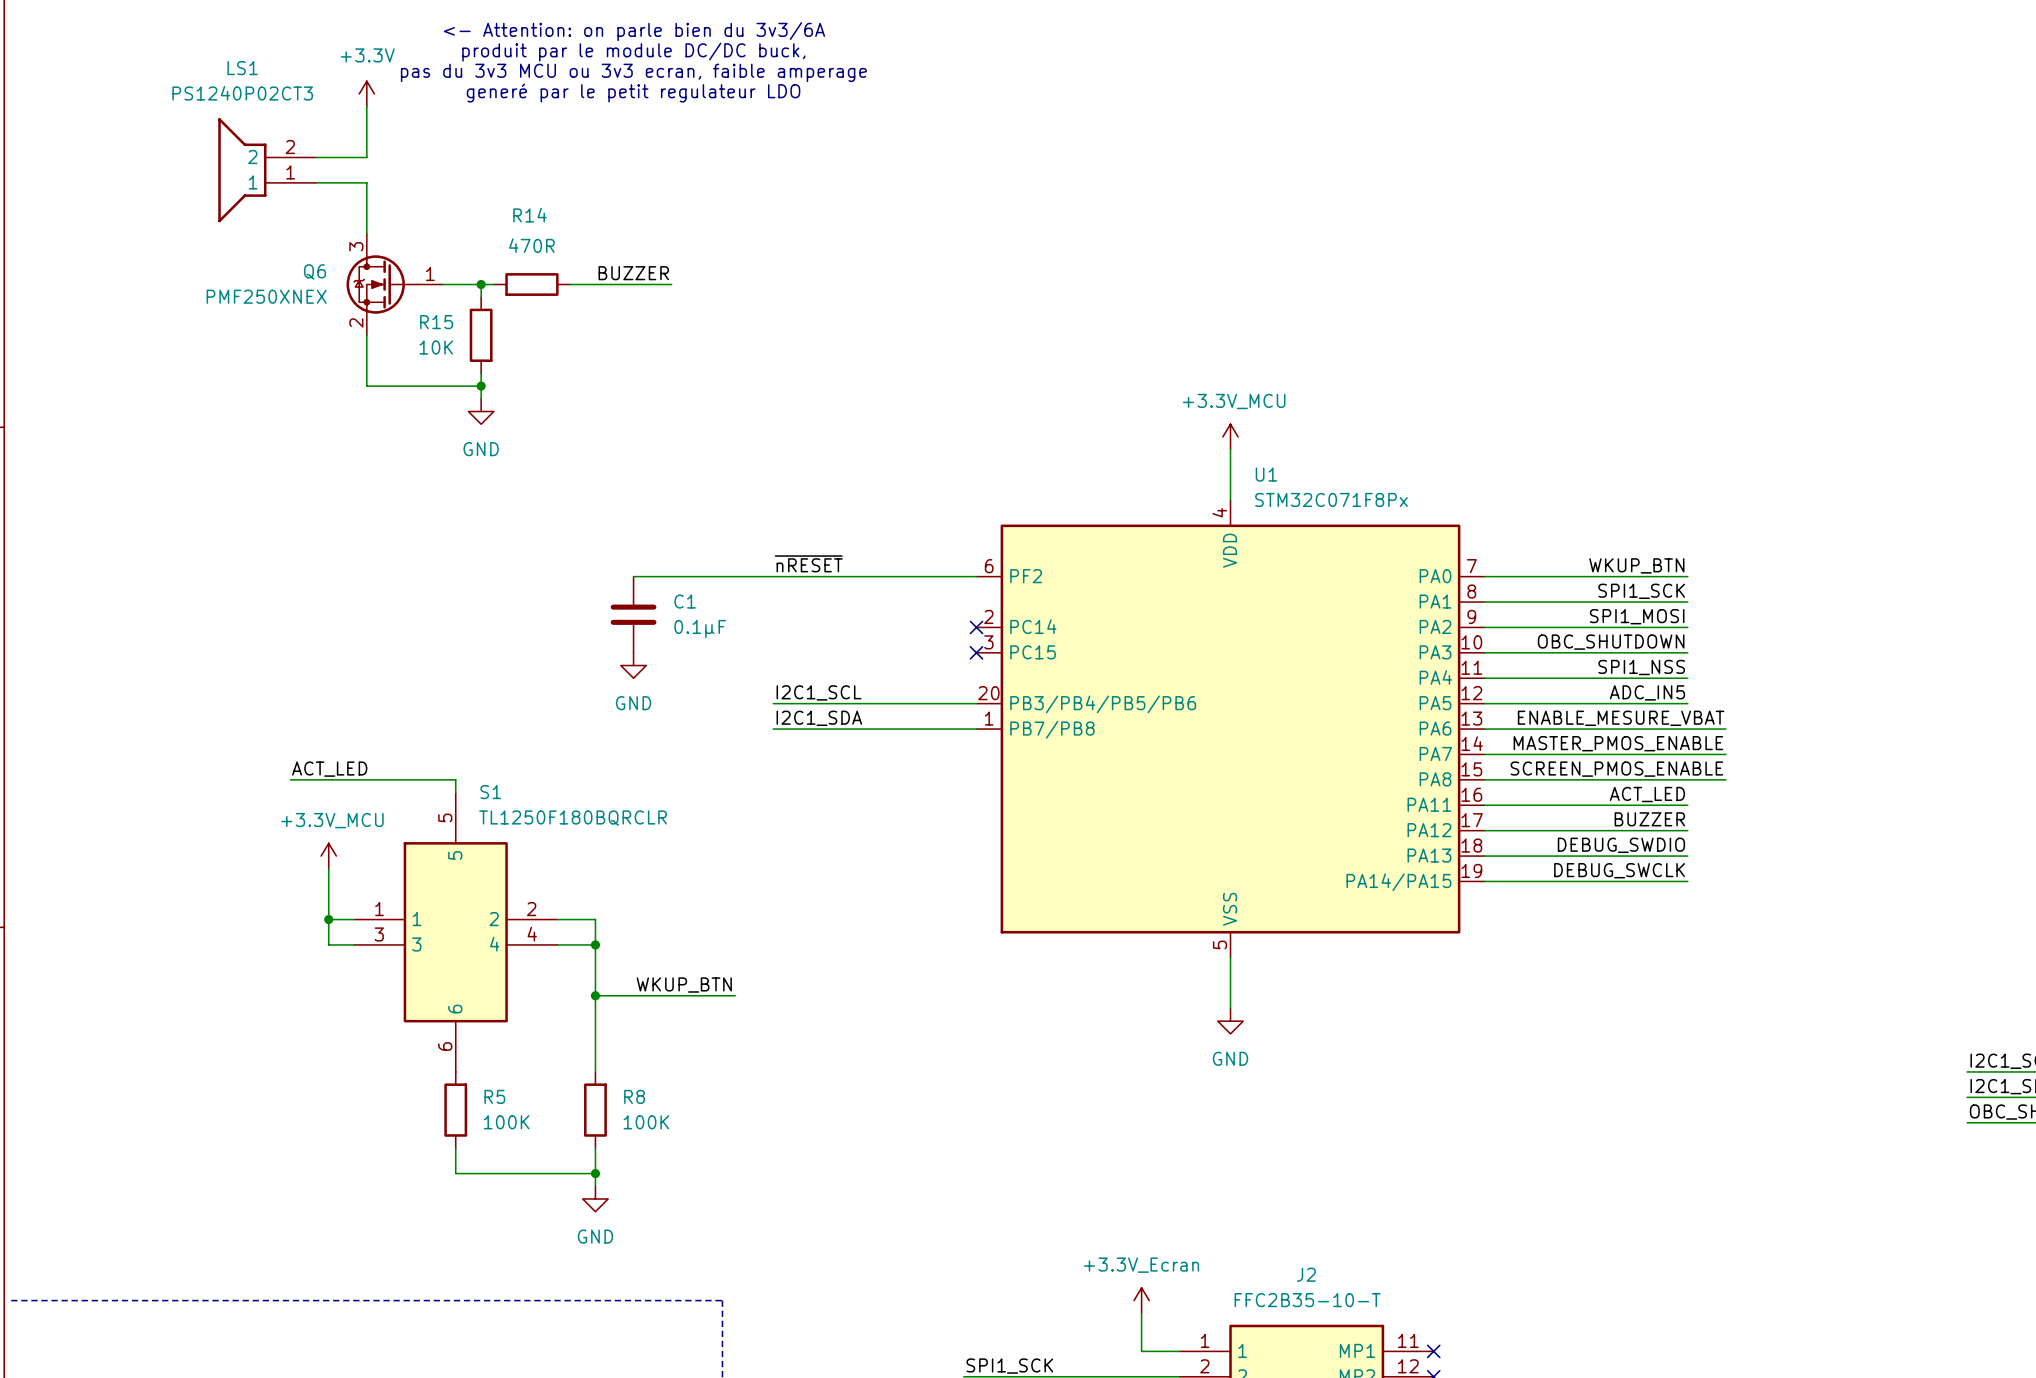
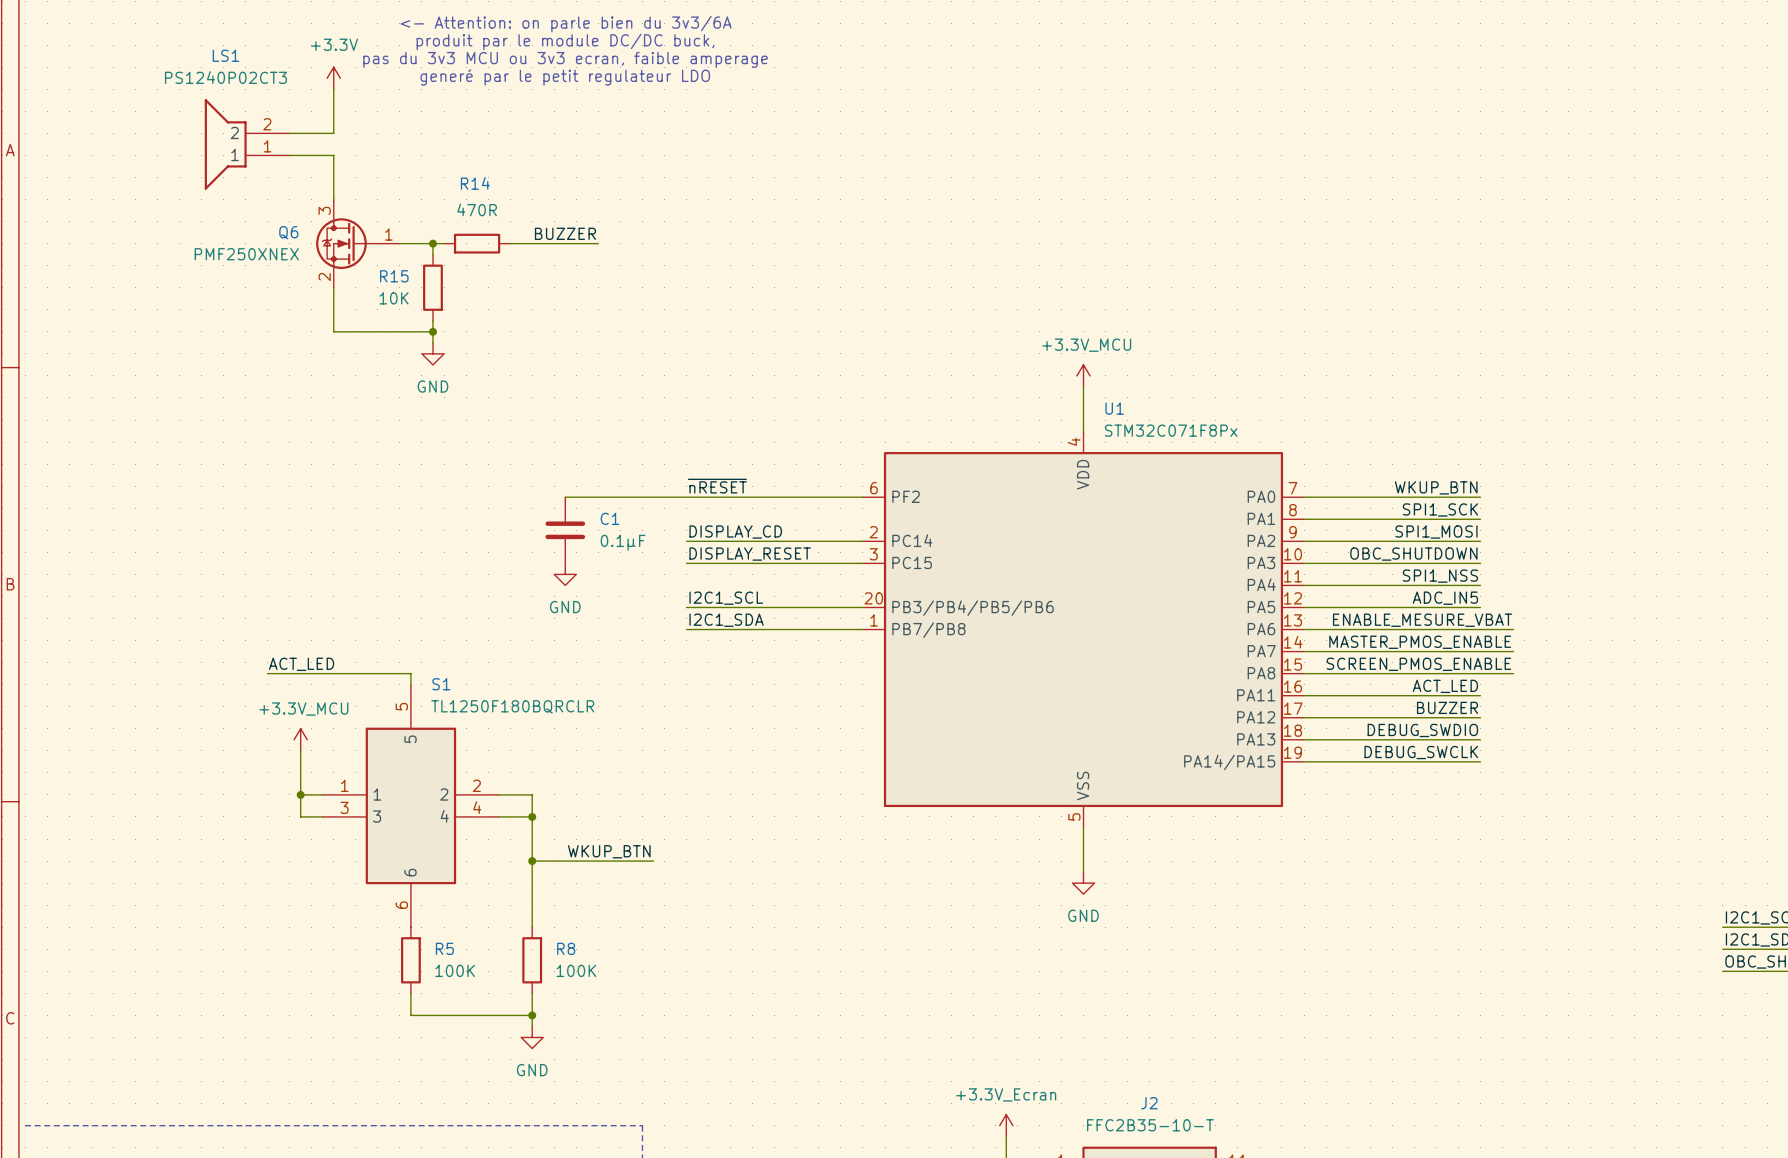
label: none -> DISPLAY_CD (735, 532)
wire: none -> (686, 541) (862, 541)
no-connect mark: (976, 627) -> none
label: none -> DISPLAY_RESET (750, 554)
wire: none -> (686, 563) (862, 563)
no-connect mark: (976, 652) -> none

